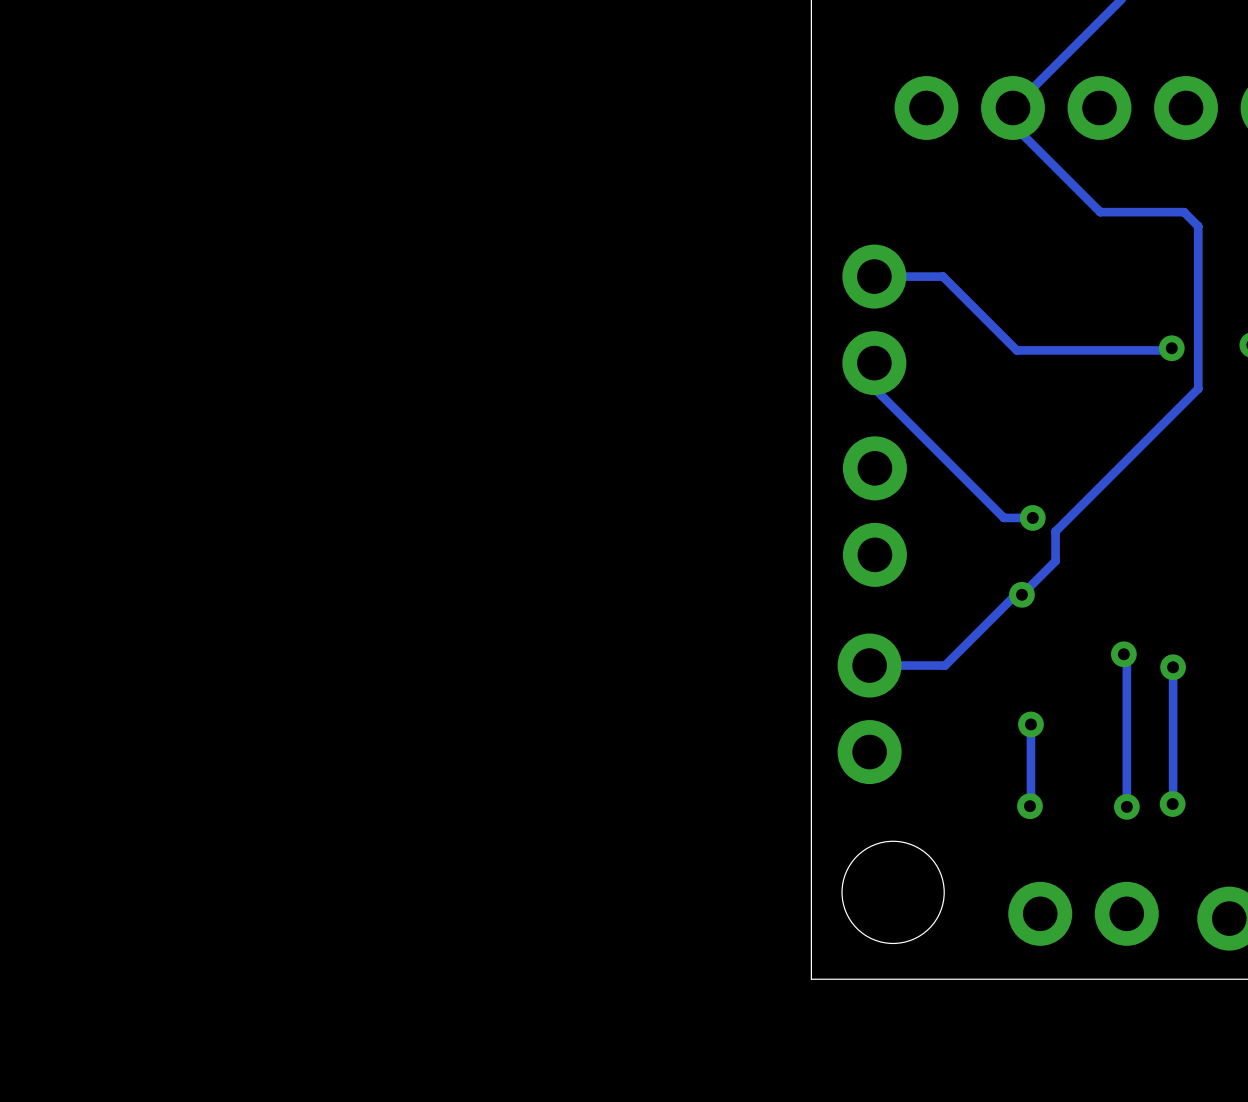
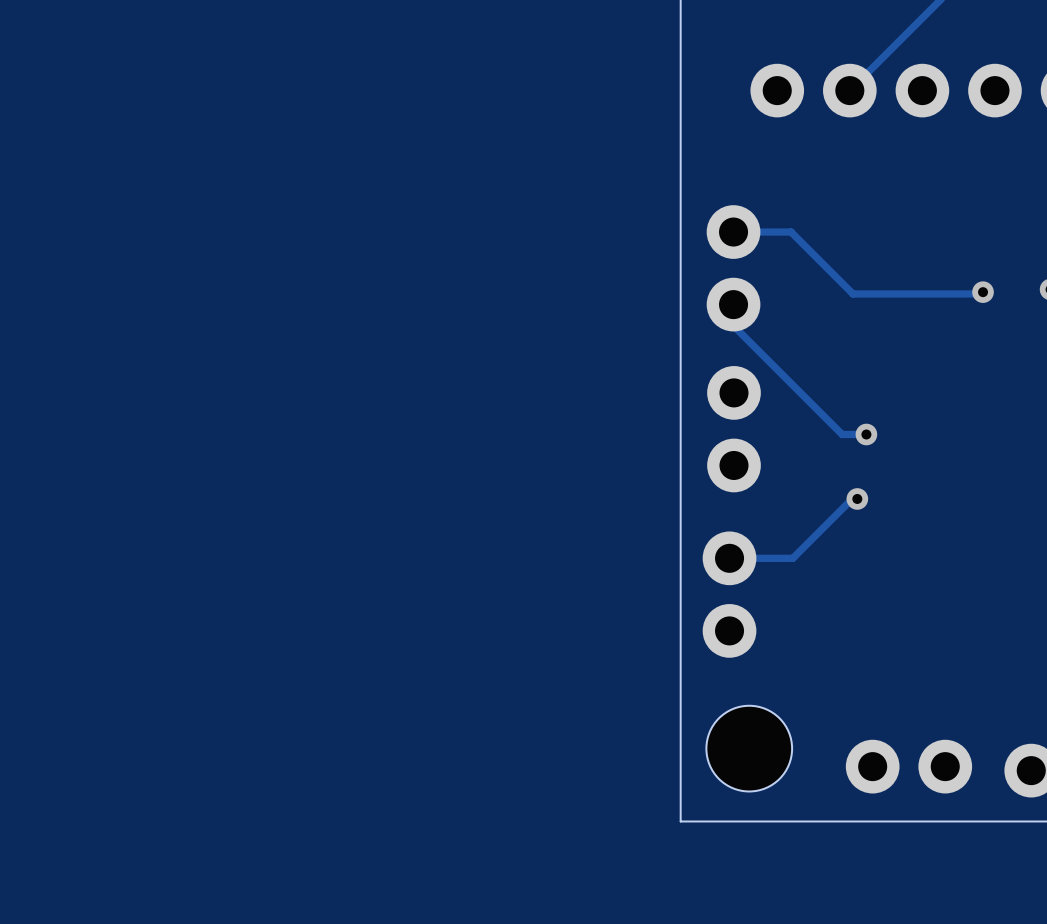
track: (1013, 107) (1013, 124) (1100, 212) (1184, 212) (1198, 226) (1198, 388) (1055, 531) (1055, 561) (1021, 594) -> none
track: (1123, 654) (1126, 657) (1126, 806) -> none
via: (1123, 654) -> none
track: (1173, 667) (1173, 803) -> none
via: (1173, 667) -> none
track: (1030, 724) (1030, 795) (1035, 800) (1029, 806) -> none
via: (1030, 724) -> none
via: (1172, 804) -> none
via: (1029, 806) -> none
via: (1126, 806) -> none

